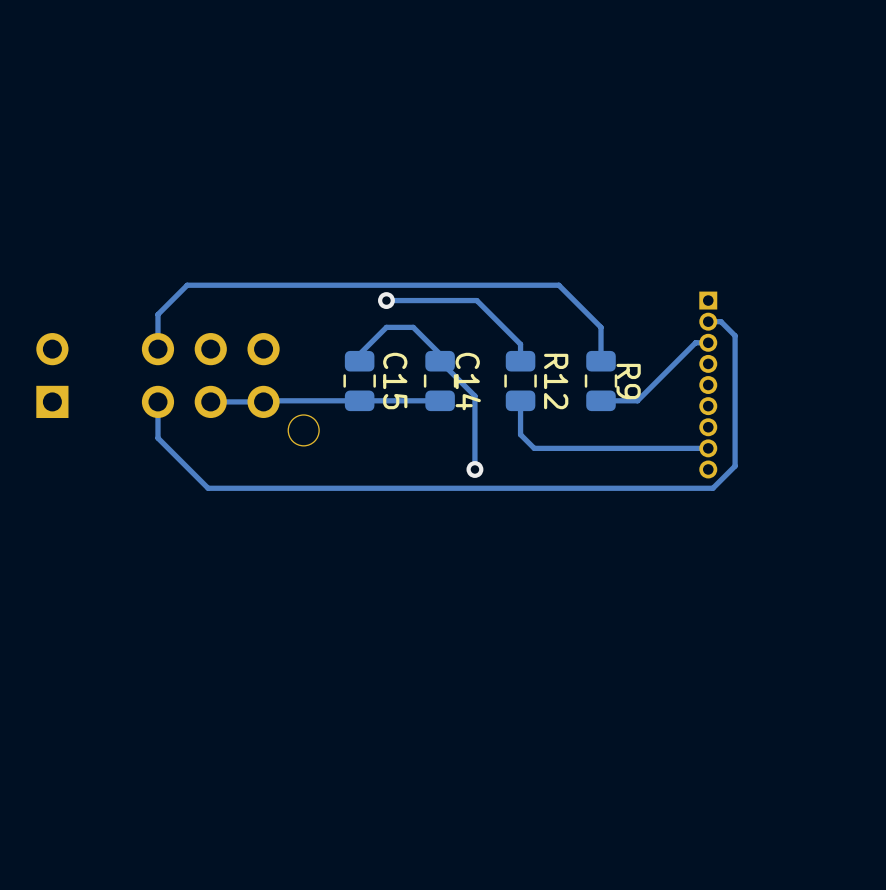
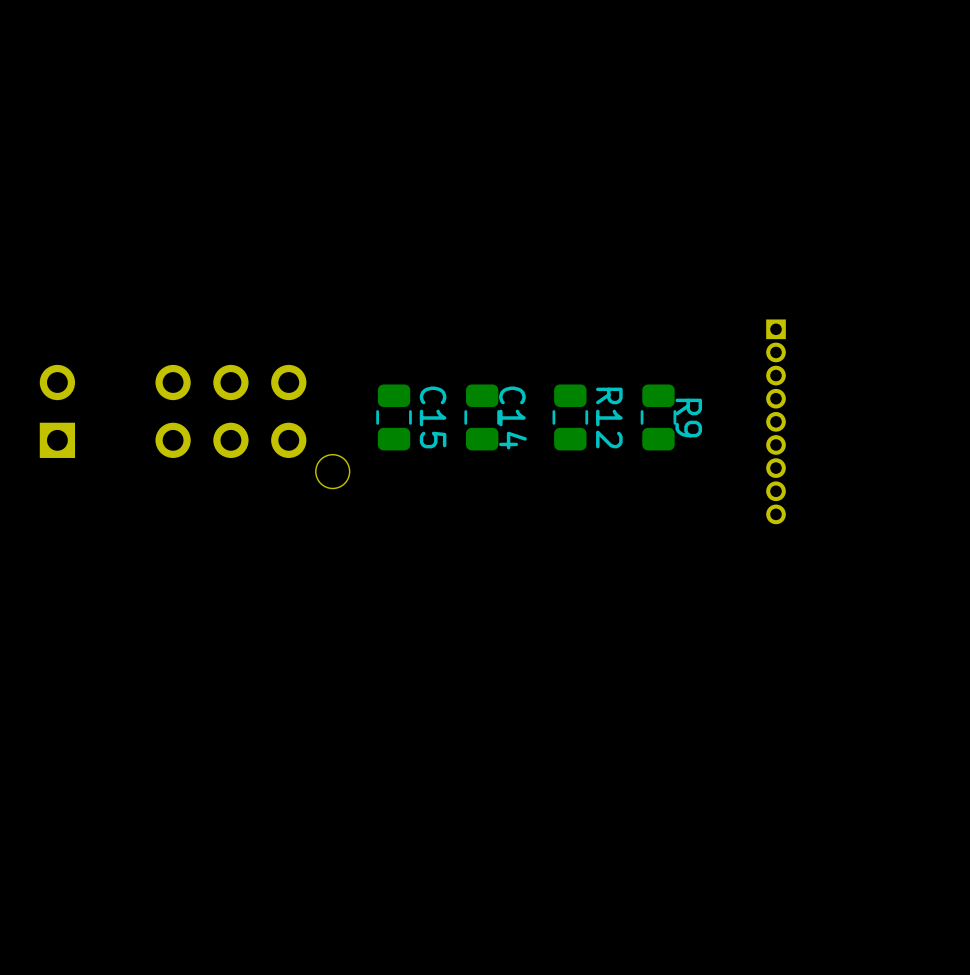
track: (386, 300) (476, 300) (520, 344) (520, 361) -> none
via: (386, 300) -> none
track: (708, 321) (720, 321) (735, 335) (735, 466) (712, 488) (208, 488) (157, 438) (157, 401) -> none
track: (708, 342) (695, 342) (637, 400) (601, 400) -> none
track: (157, 349) (157, 314) (187, 285) (558, 285) (601, 327) (601, 361) -> none
track: (359, 361) (359, 354) (386, 327) (413, 327) (440, 354) (440, 361) (474, 396) (474, 469) -> none
track: (440, 400) (210, 401) -> none
track: (520, 400) (520, 434) (534, 448) (708, 448) -> none
via: (474, 469) -> none

